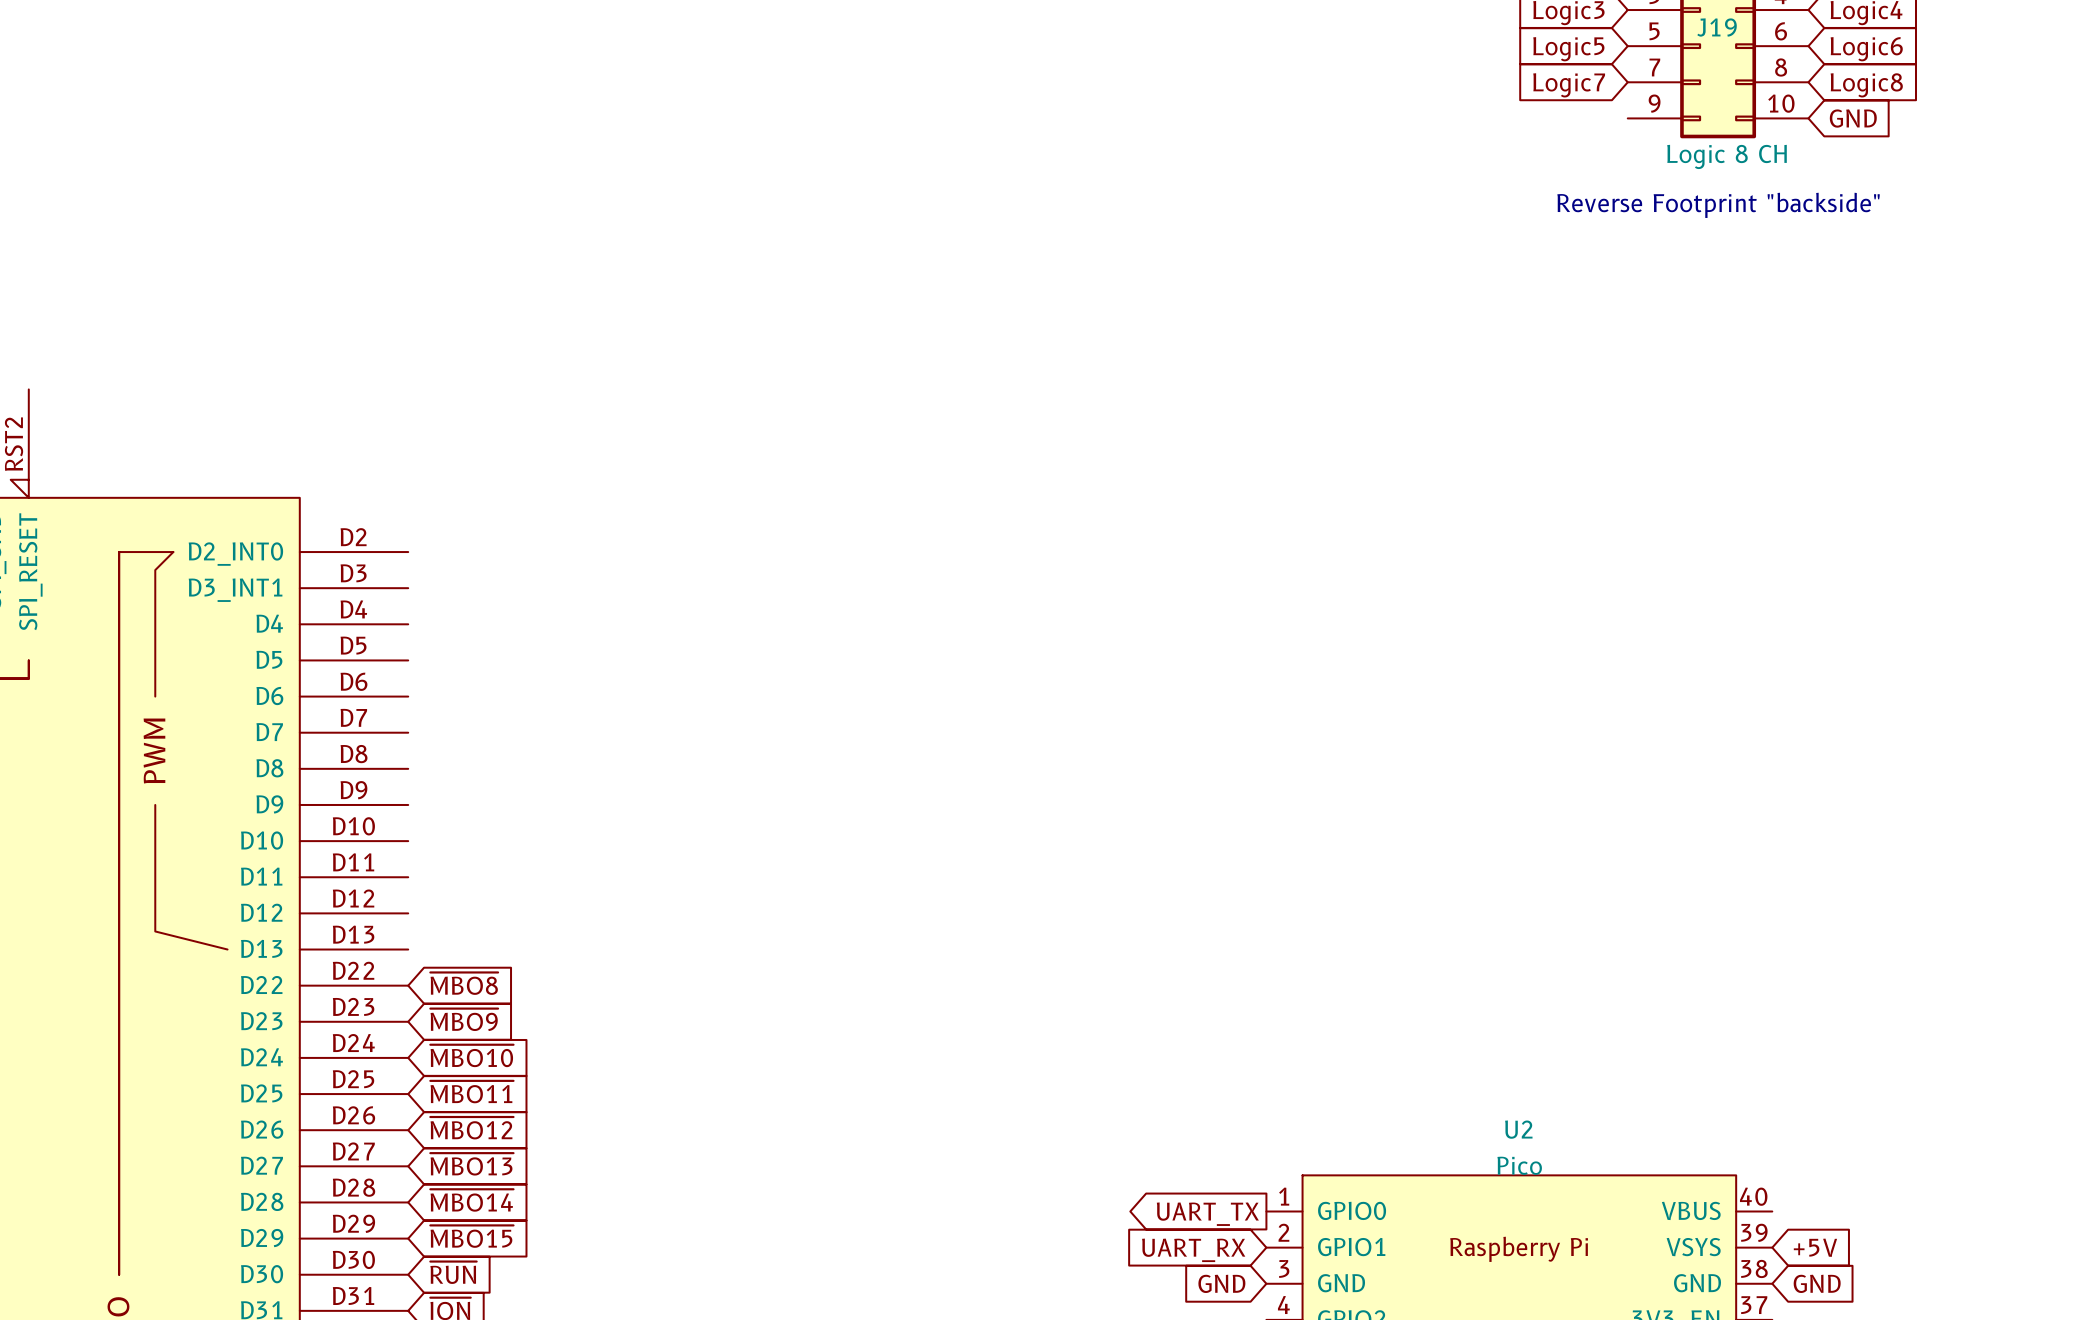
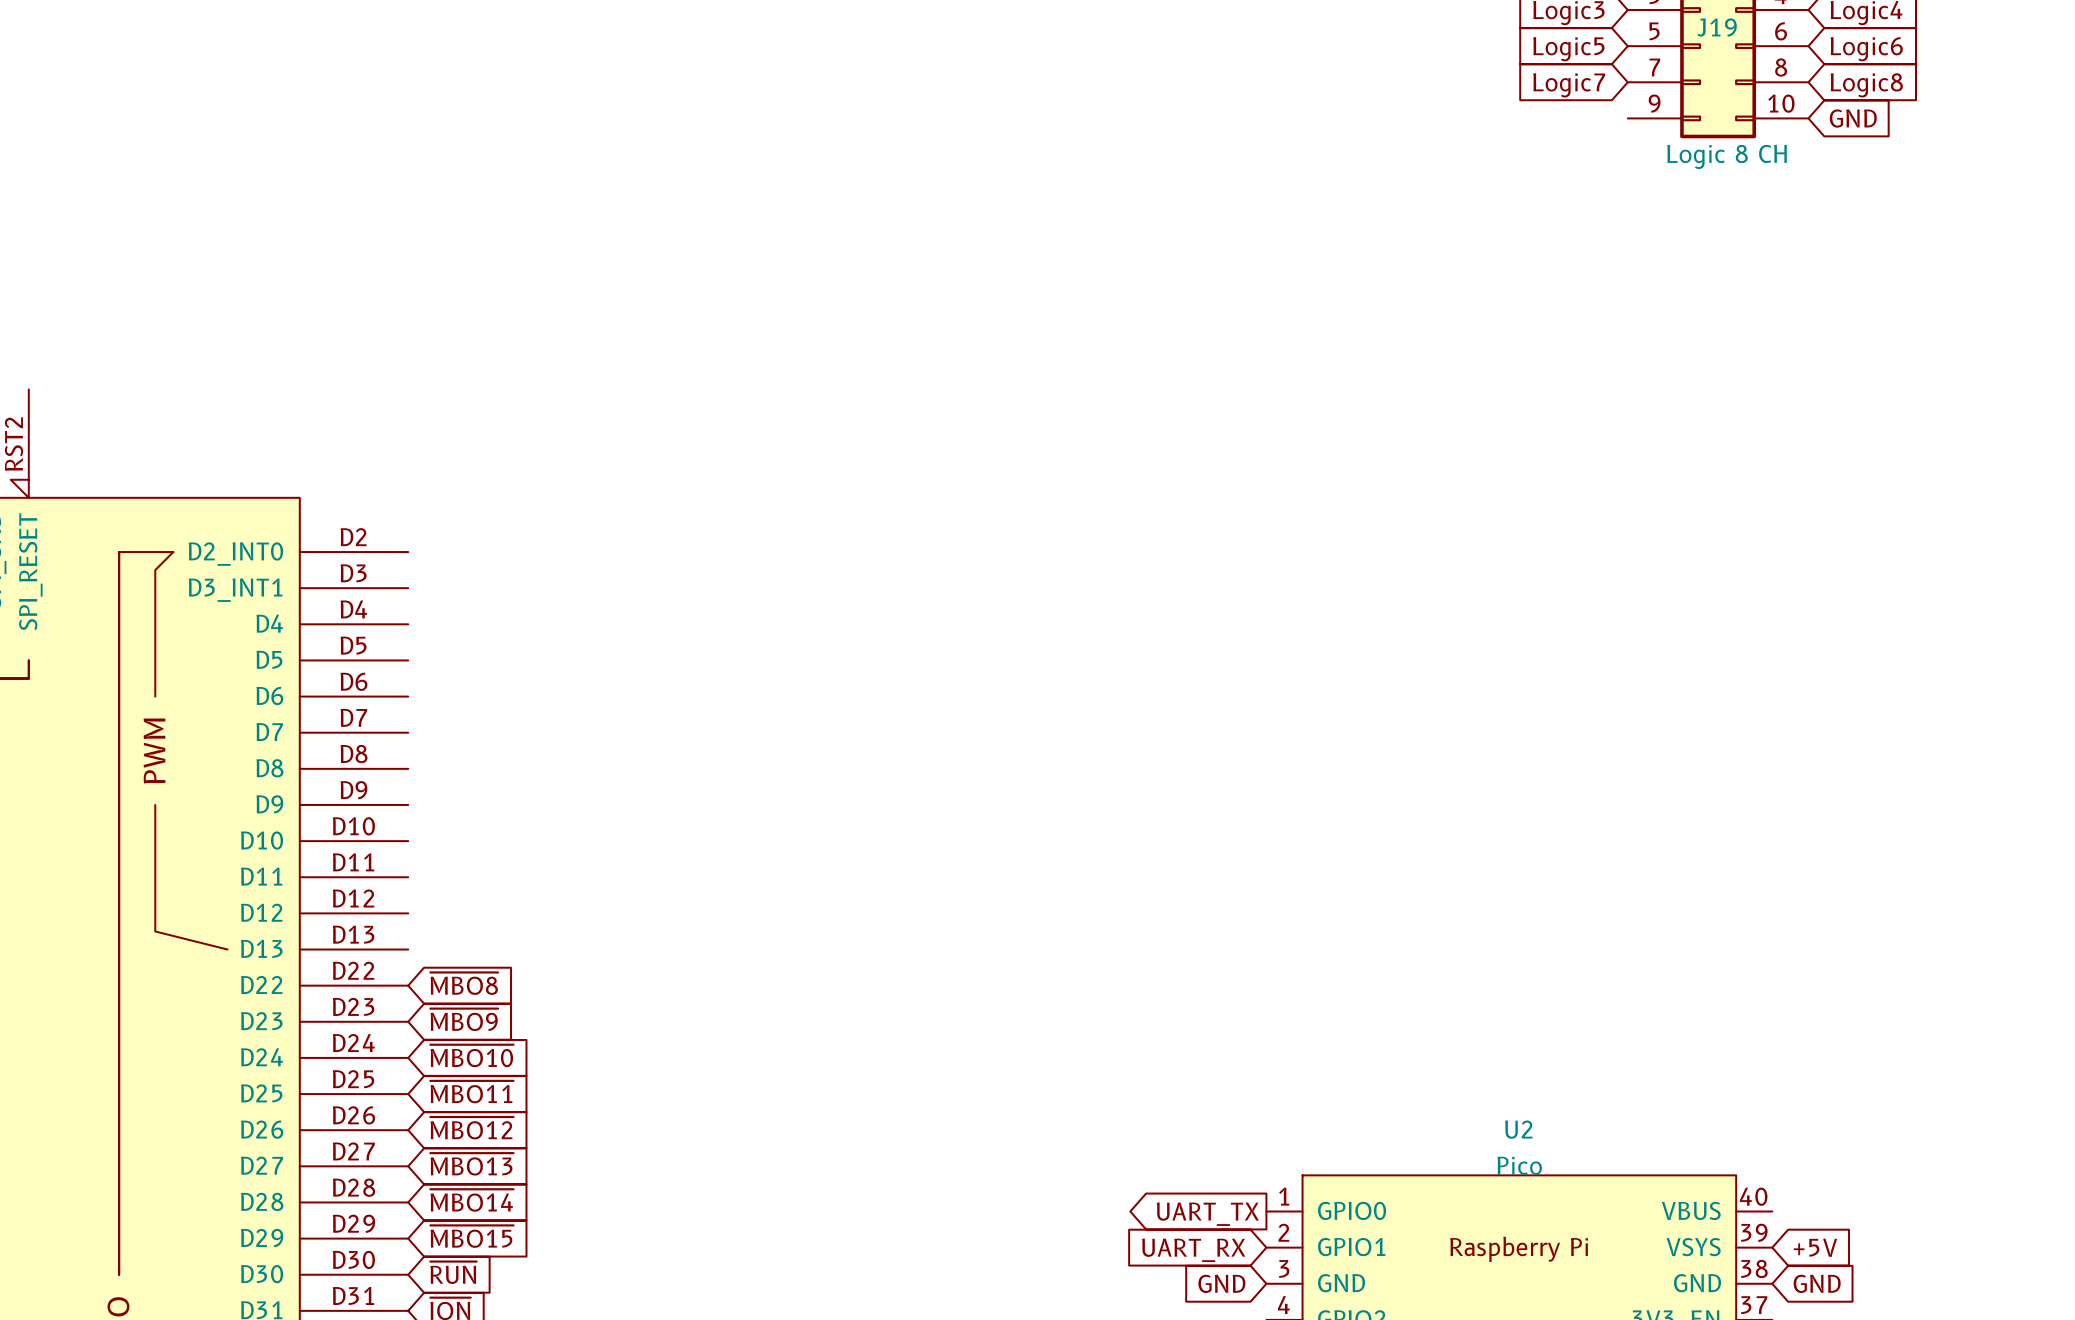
text: Reverse Footprint "backside" (1718, 205) -> none

